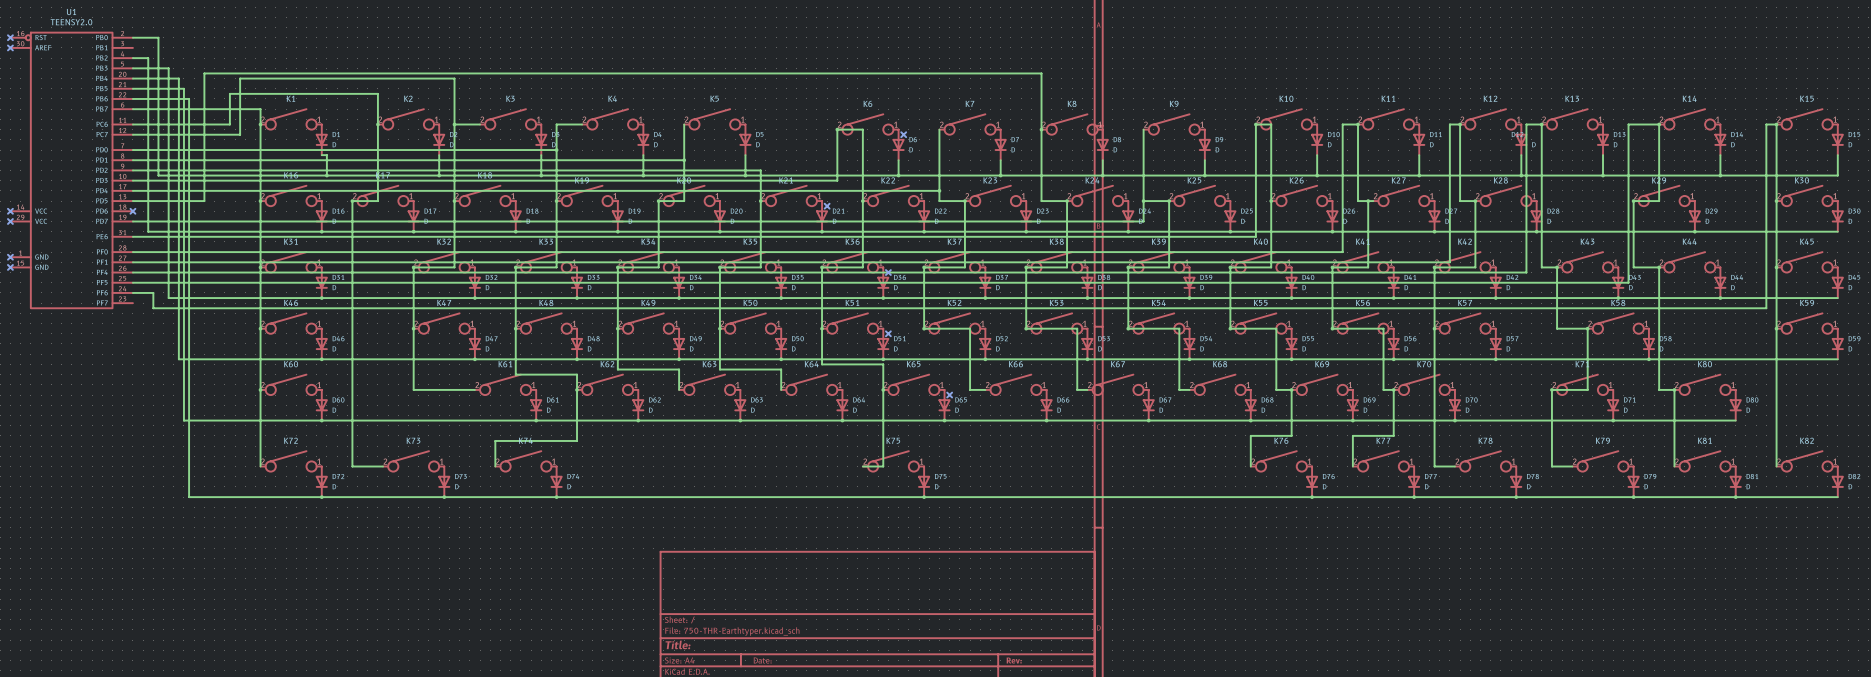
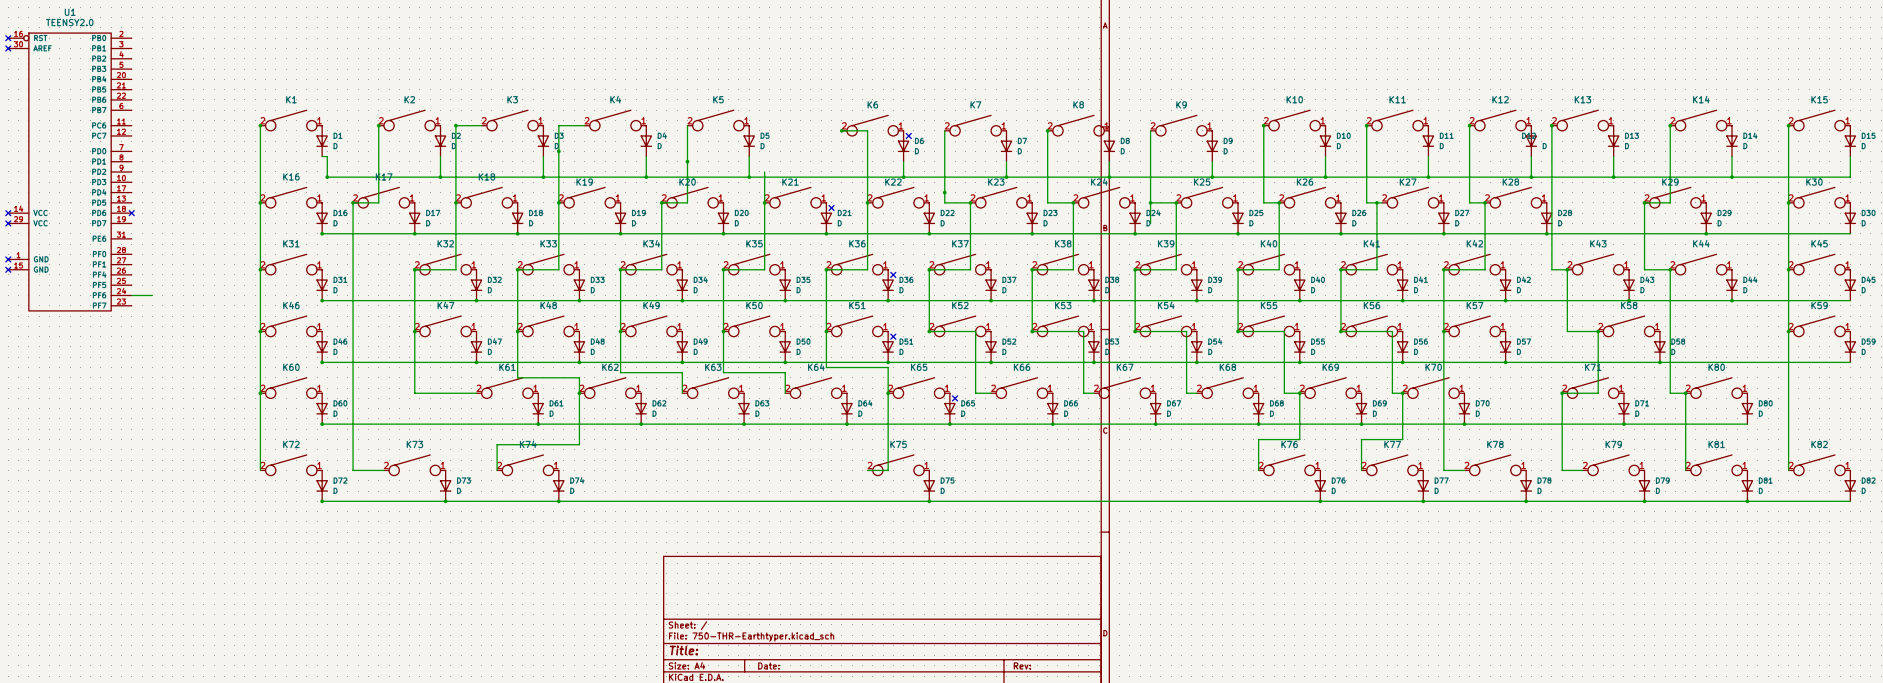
wire: (132, 37) (158, 37) (158, 175) (326, 175) -> none
wire: (132, 58) (148, 58) (148, 231) (321, 231) -> none
wire: (132, 68) (168, 68) (168, 298) (321, 298) -> none
wire: (132, 78) (178, 78) (178, 359) (321, 359) -> none
wire: (132, 88) (183, 88) (183, 420) (321, 420) -> none
wire: (132, 98) (189, 98) (189, 497) (321, 497) -> none
wire: (132, 109) (260, 109) (260, 124) -> none
wire: (132, 124) (229, 124) (229, 93) (377, 93) (377, 124) -> none
wire: (454, 124) (454, 78) (240, 78) (240, 134) (132, 134) -> none
wire: (1255, 124) (1271, 124) (1271, 201) -> (1263, 202) (1279, 202)
wire: (1357, 124) (1342, 124) (1342, 252) (132, 252) -> none
wire: (1460, 124) (1449, 124) (1449, 262) (132, 262) -> none
wire: (1541, 124) (1526, 124) (1526, 272) (132, 272) -> none
wire: (1659, 124) (1628, 124) (1628, 282) (132, 282) -> none
wire: (1776, 124) (1766, 124) (1766, 308) (153, 308) (153, 292) -> none
wire: (837, 129) (837, 180) (132, 180) -> none
wire: (1041, 129) (1041, 73) (204, 73) (204, 201) (132, 201) -> none
wire: (132, 150) (556, 150) -> none
wire: (132, 160) (684, 160) -> none
wire: (132, 170) (760, 170) -> none
wire: (132, 190) (939, 190) -> none
wire: (1255, 201) (1255, 236) (132, 236) -> none
wire: (132, 221) (1143, 221) -> none

